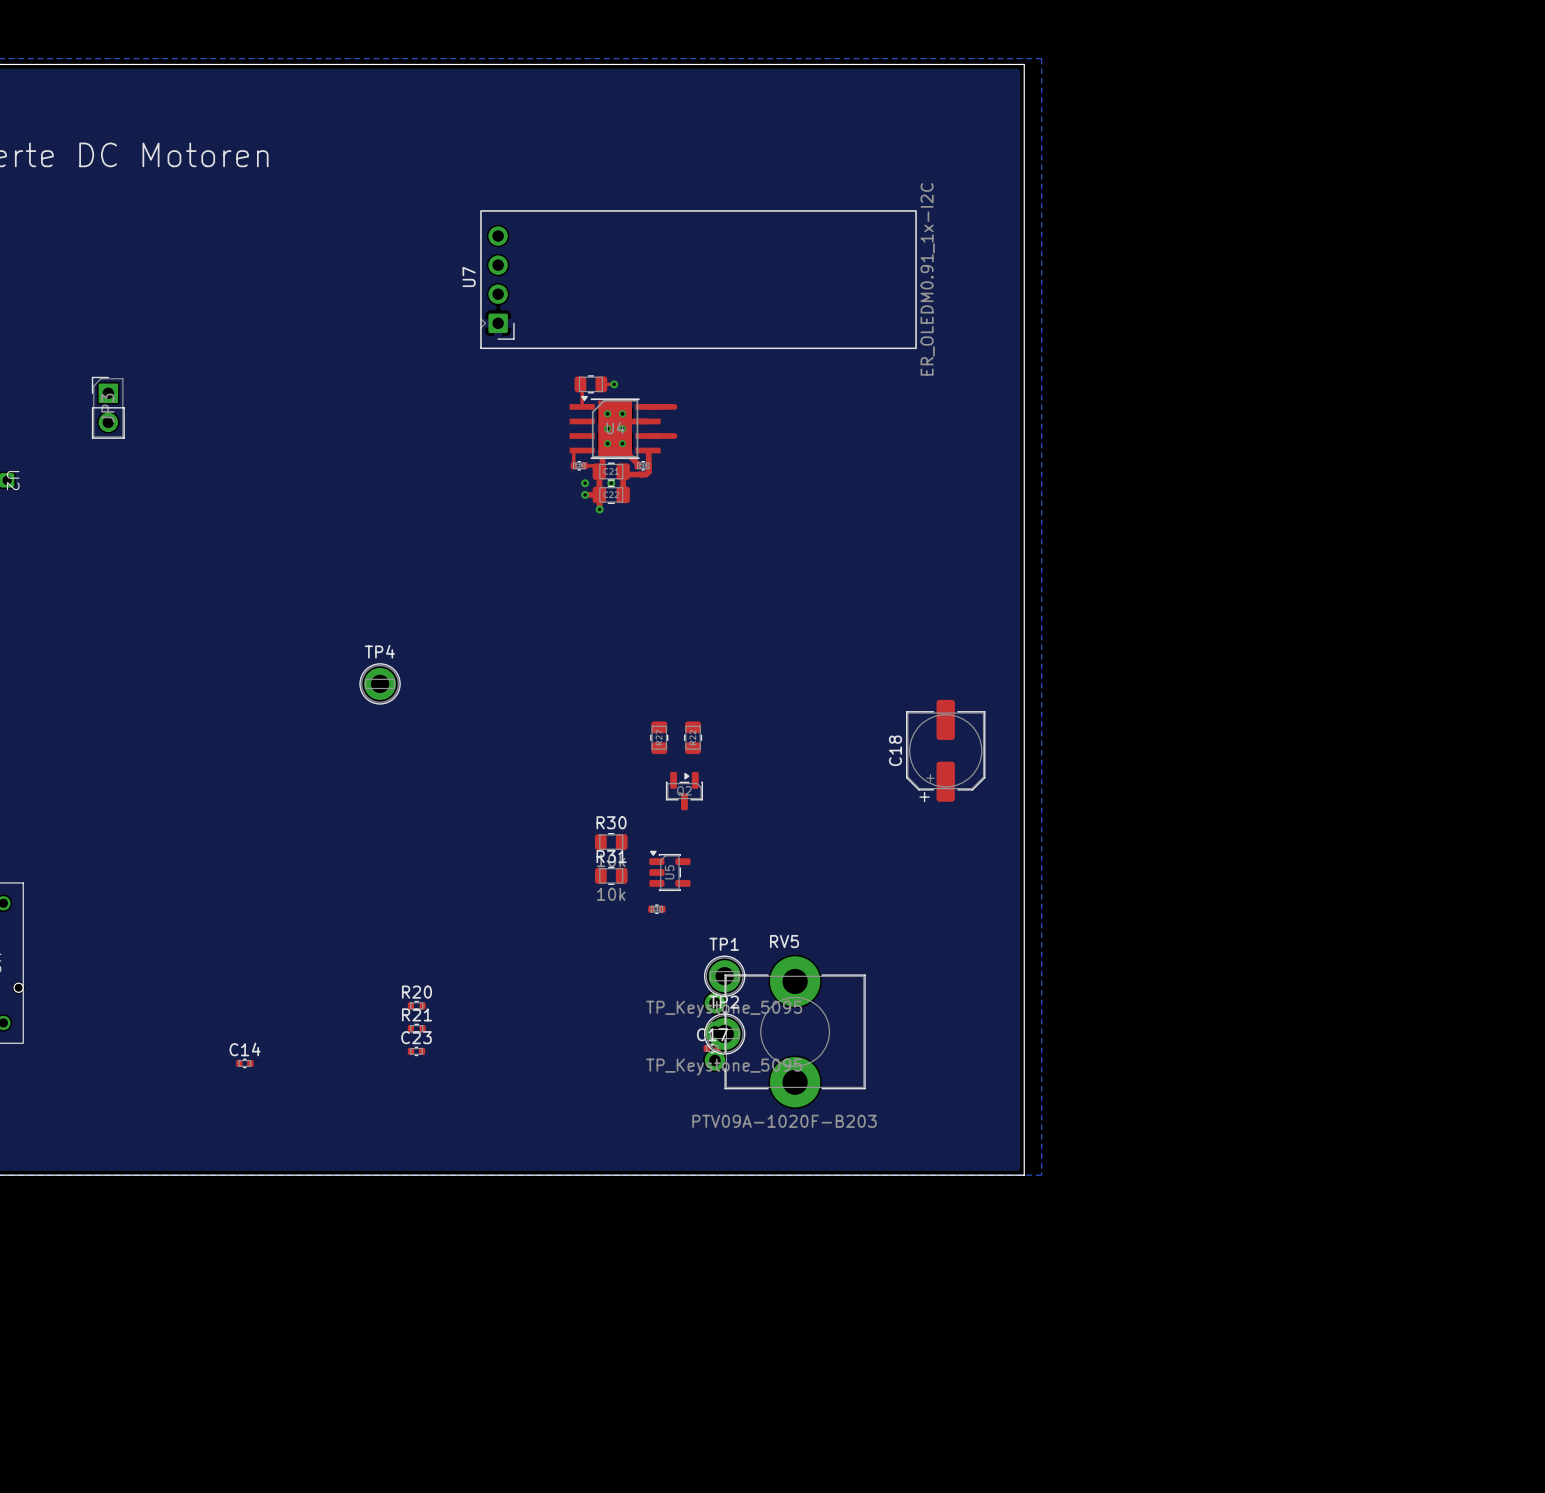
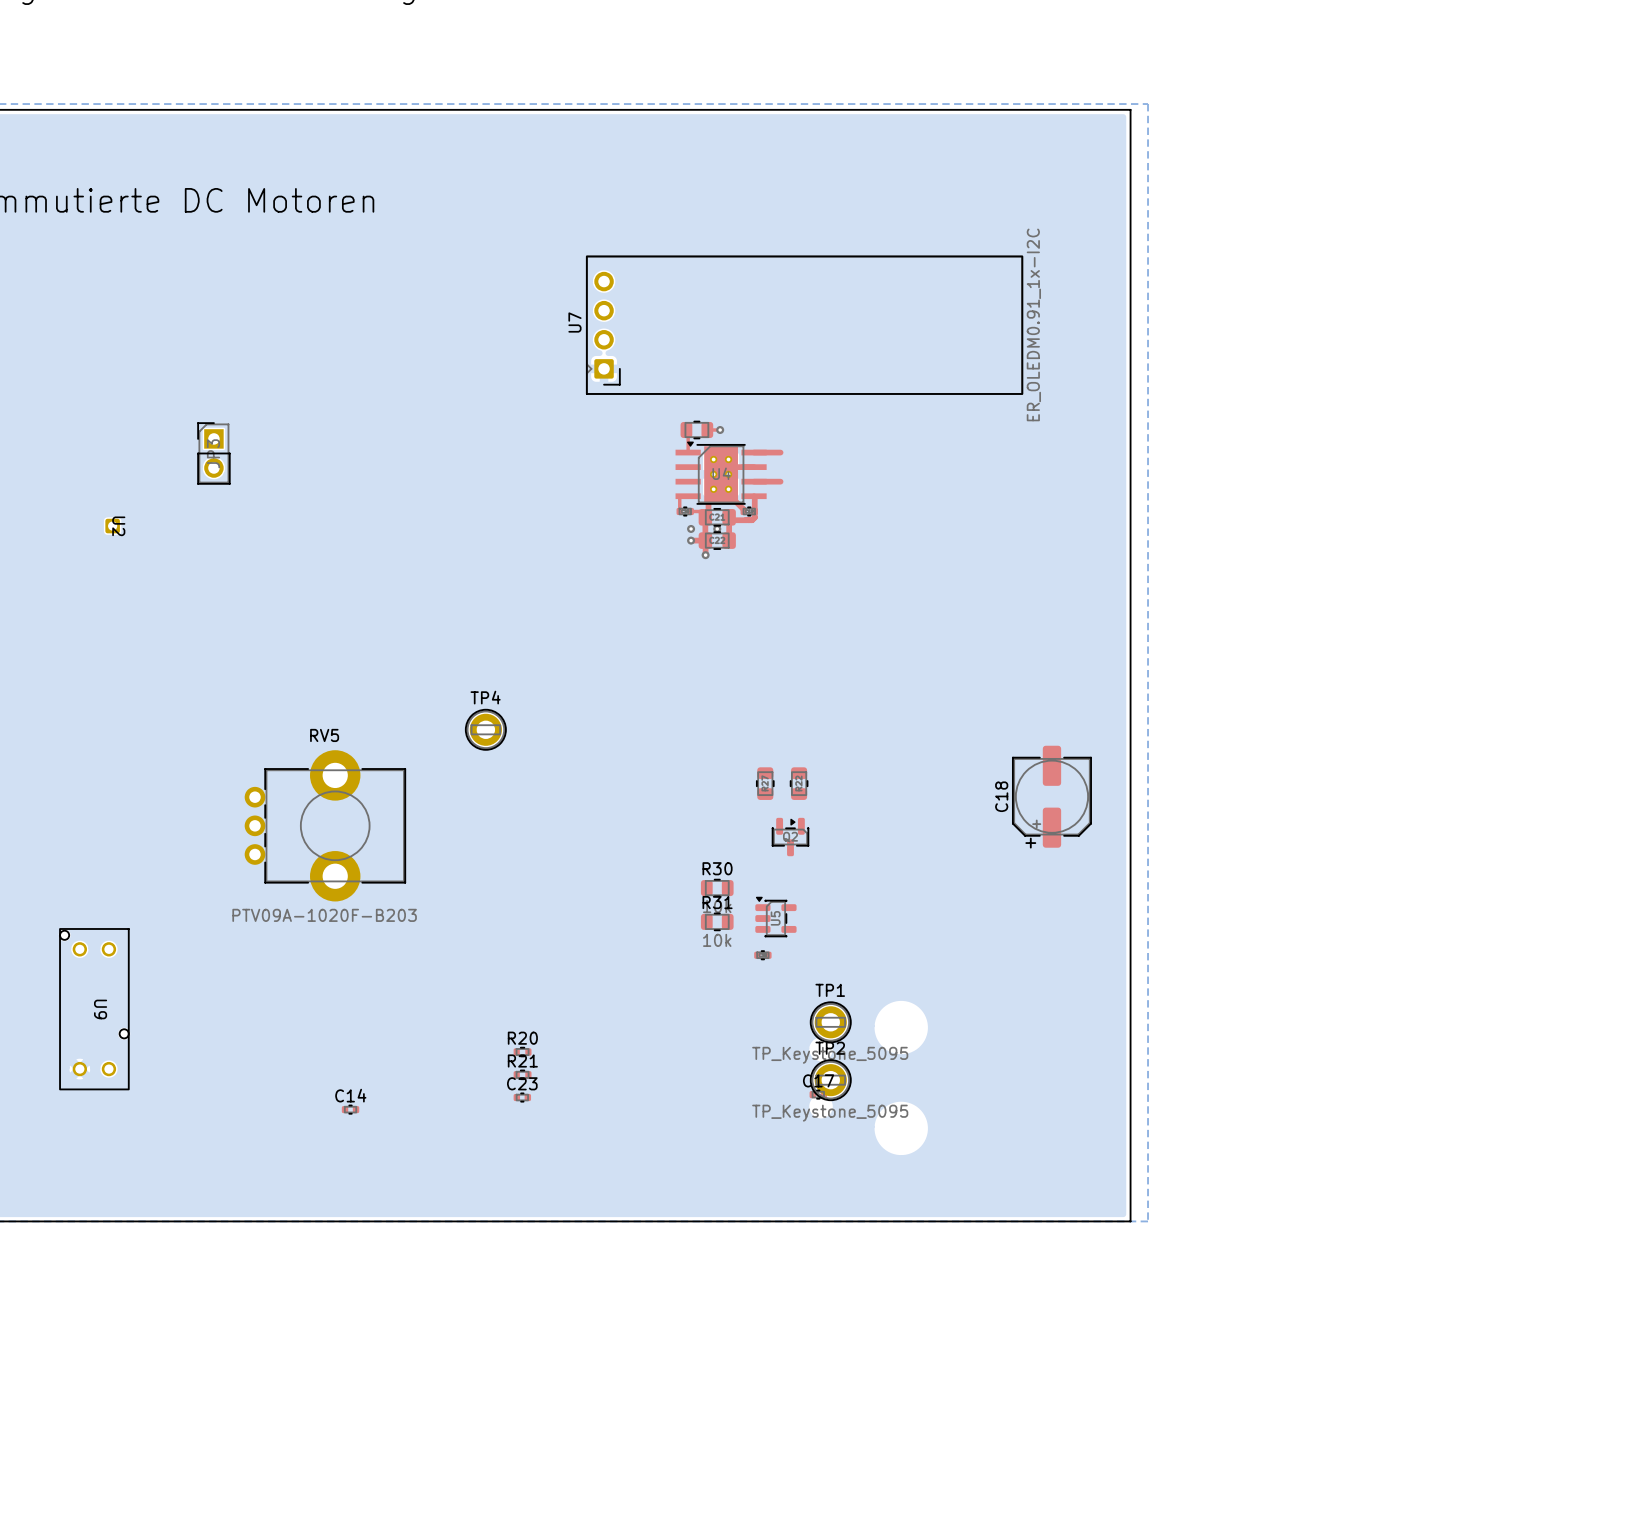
RV5 position: (785, 1031) -> (325, 825)

